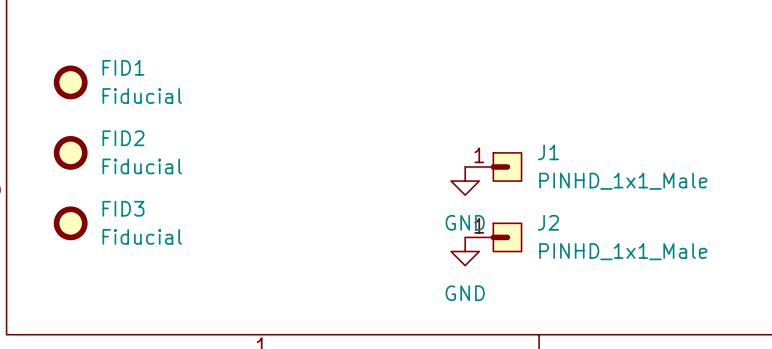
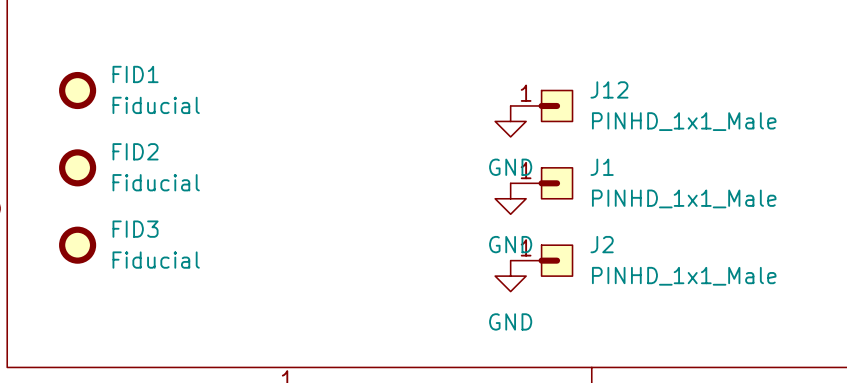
J12: none -> PINHD_1x1_Male (541, 105)
power symbol: none -> GND (510, 121)

